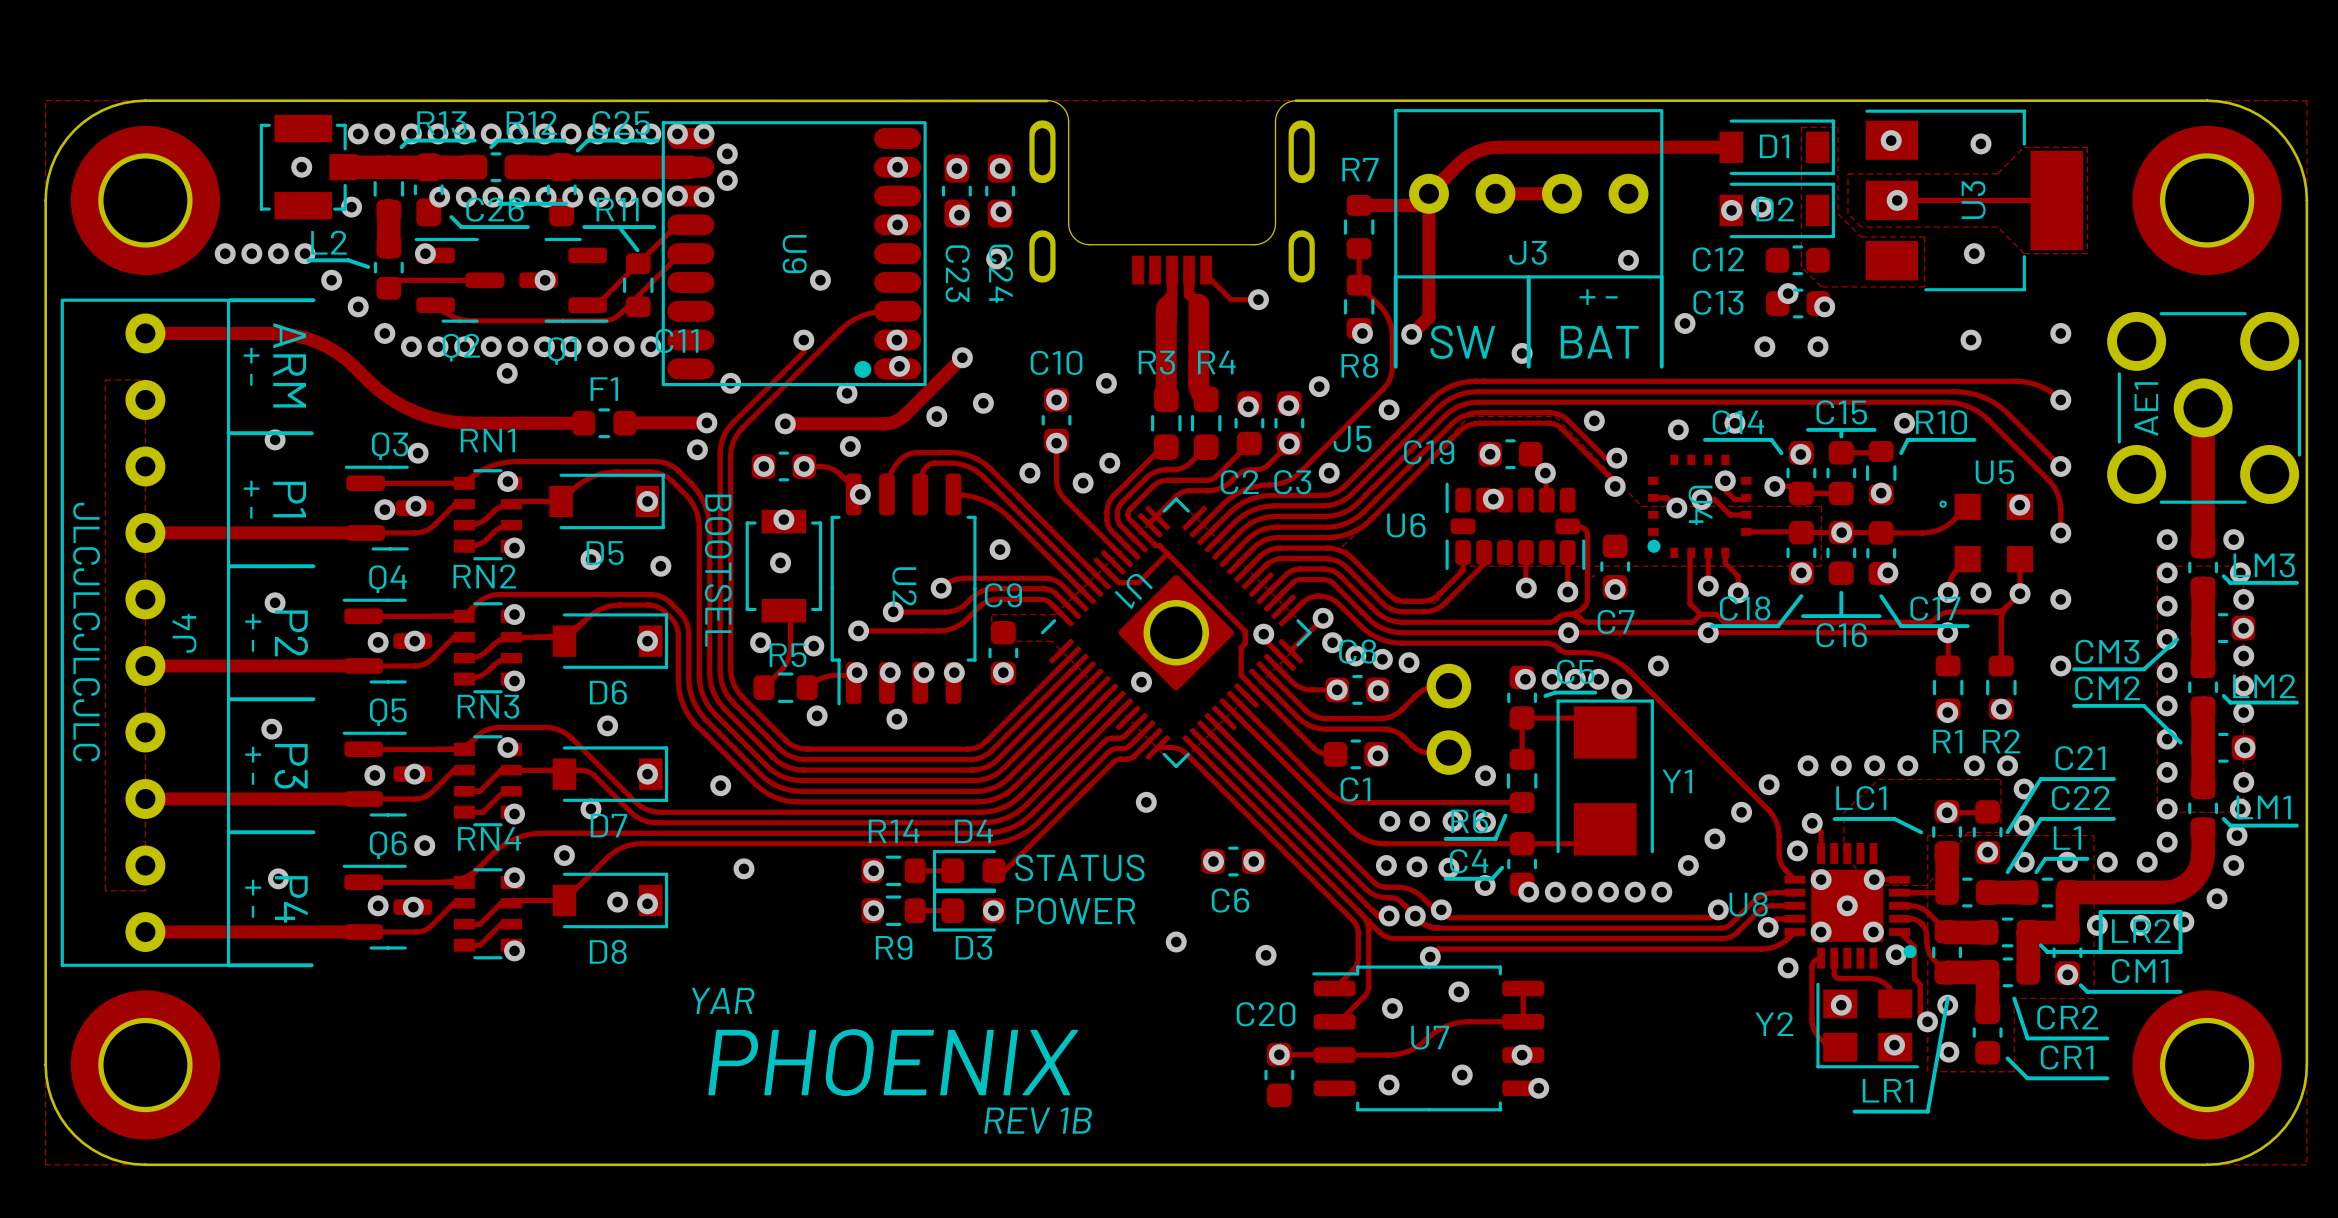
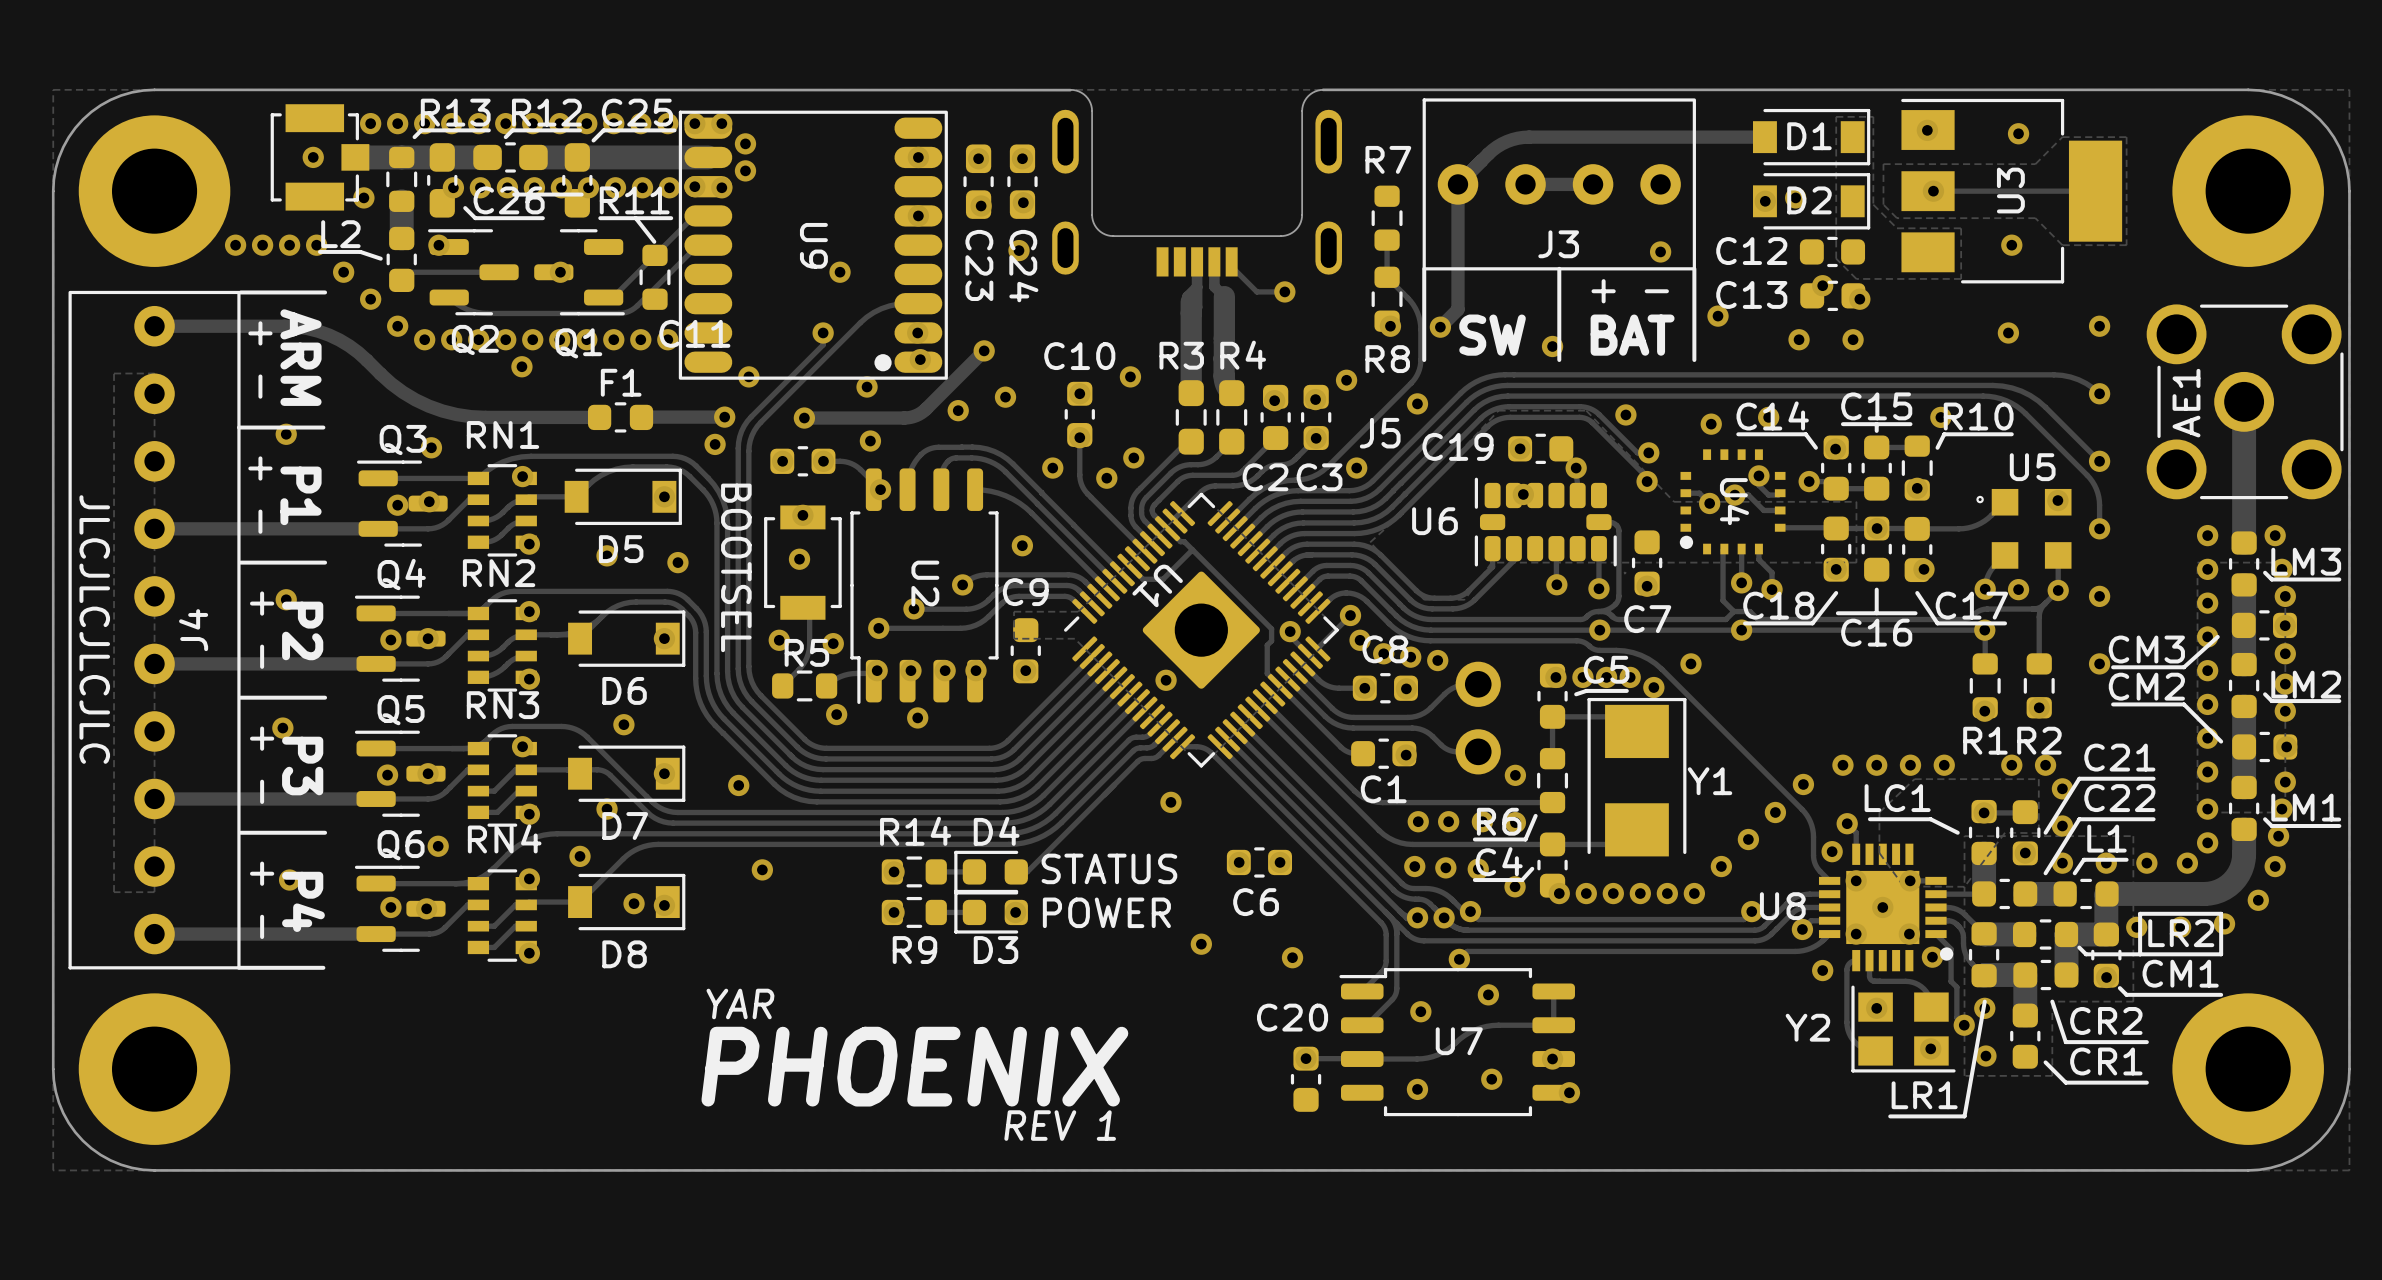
track: (1428, 193) (1417, 205) (1359, 205) -> none
text: REV 1B (1038, 1120) -> REV 1 (1060, 1125)

